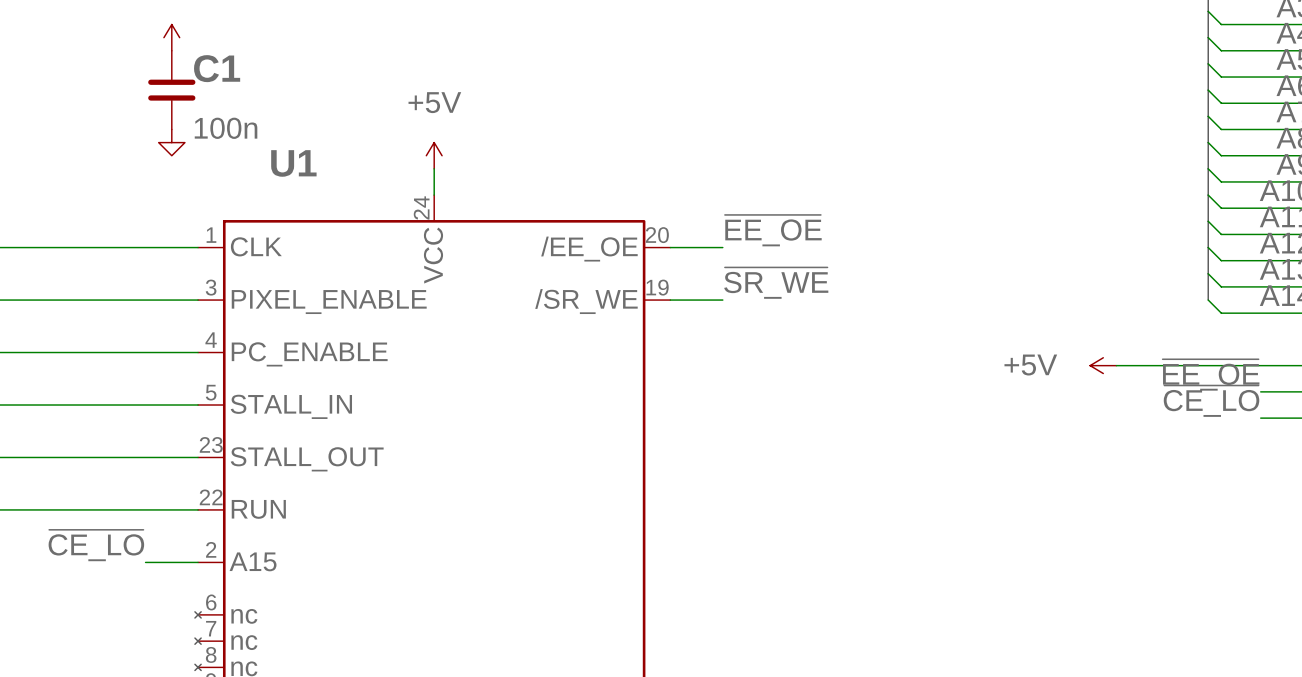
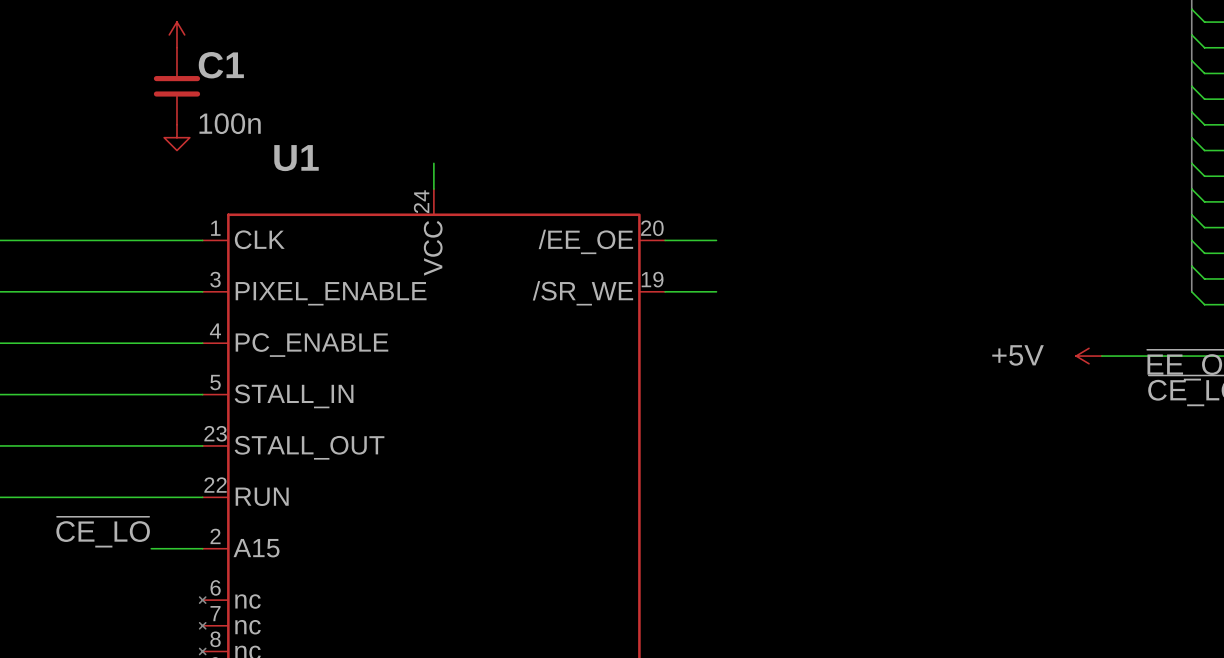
power symbol: +5V (434, 155) -> none
label: ~{EE_OE} (773, 230) -> none
label: ~{SR_WE} (776, 283) -> none

